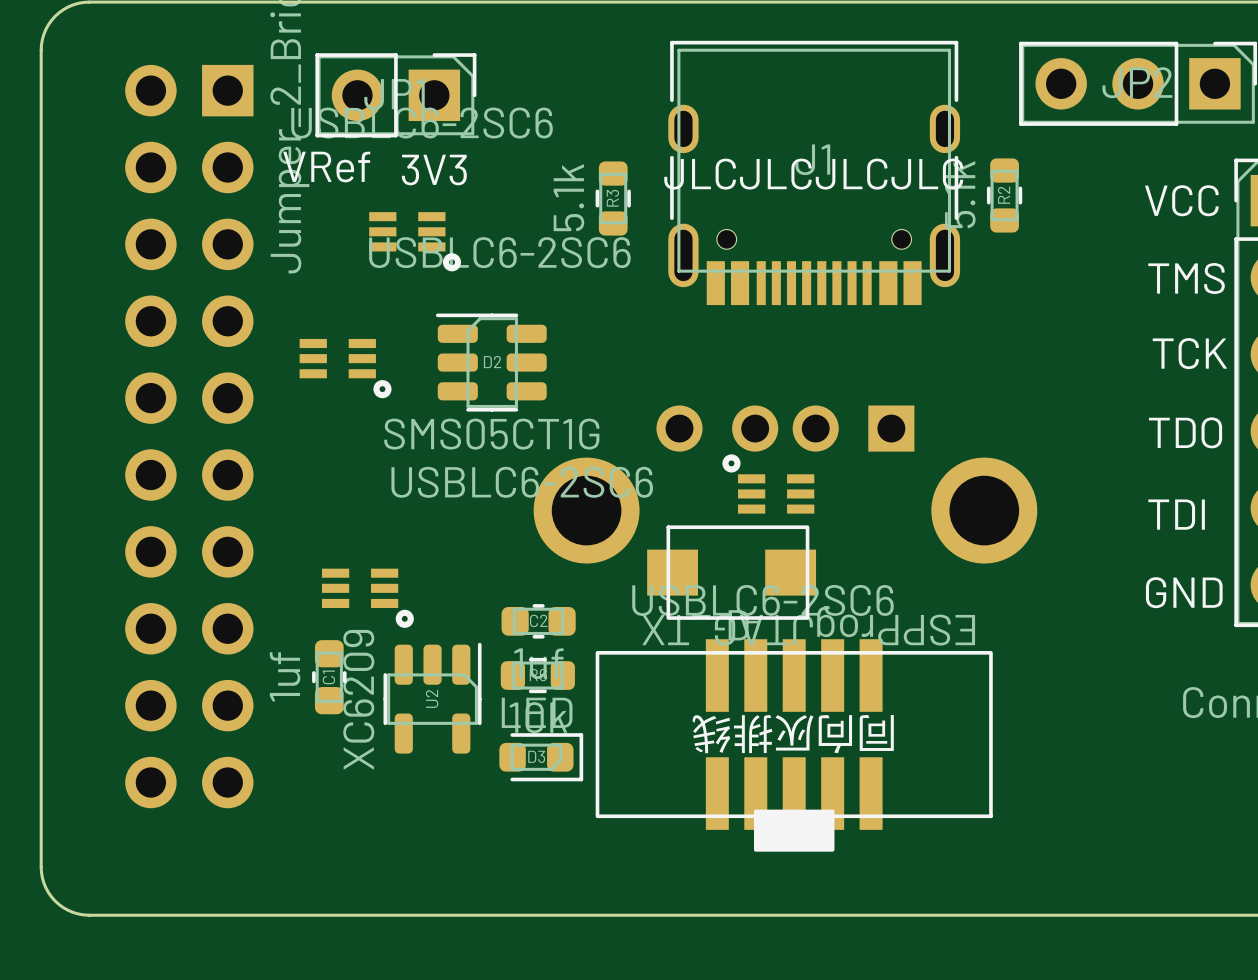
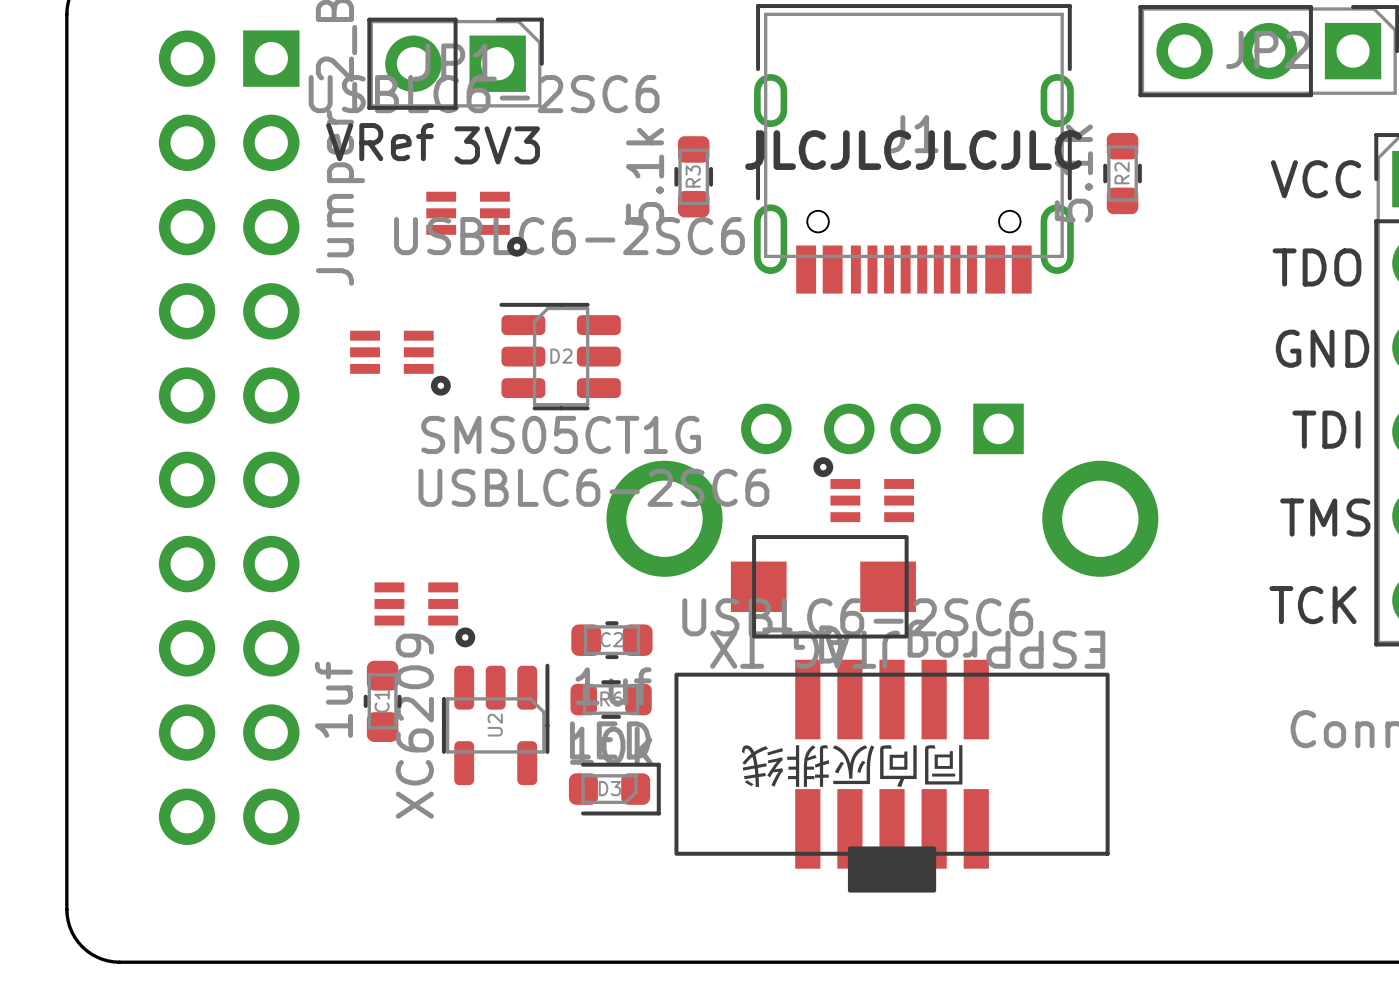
text: TMS (1186, 278) -> TDO (1316, 267)
text: TCK (1189, 353) -> GND (1322, 348)
text: TDO (1185, 432) -> TDI (1326, 429)
text: TDI (1176, 514) -> TMS (1325, 517)
text: GND (1184, 592) -> TCK (1313, 605)
part text position: 同向灰排线 (793, 734) -> 同向灰排线 (852, 766)

